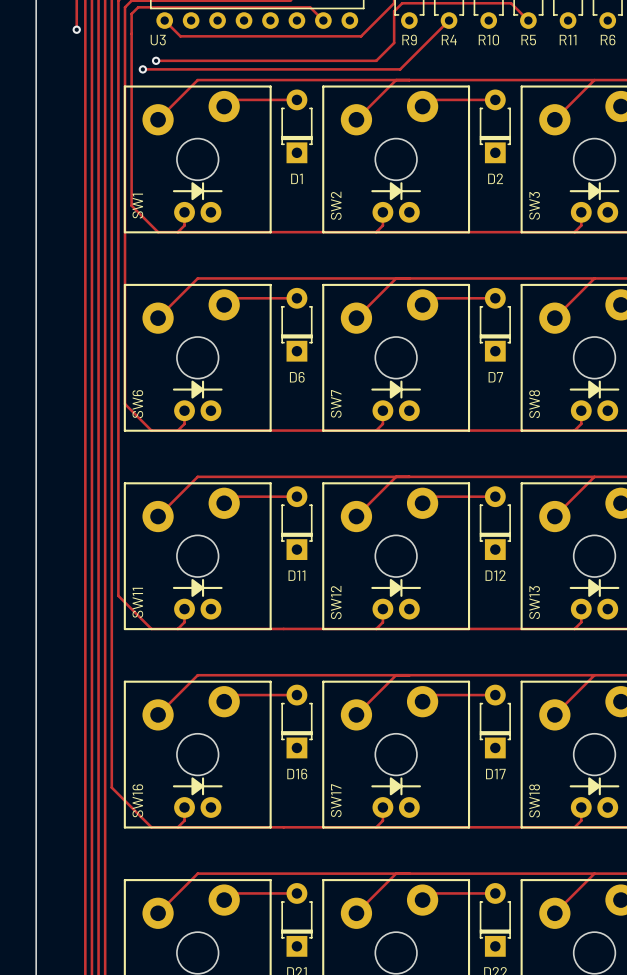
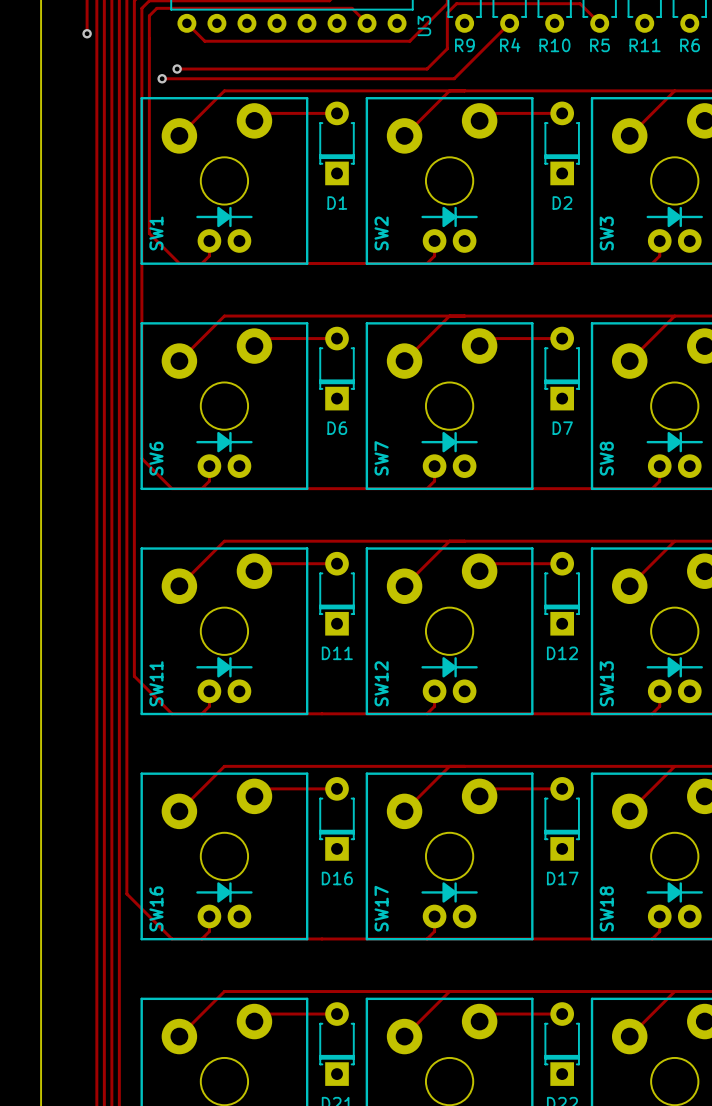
U3 name rotation: 0° (158, 40) -> 90° counterclockwise (424, 25)
U3 name position: U3 (158, 40) -> U3 (424, 25)

